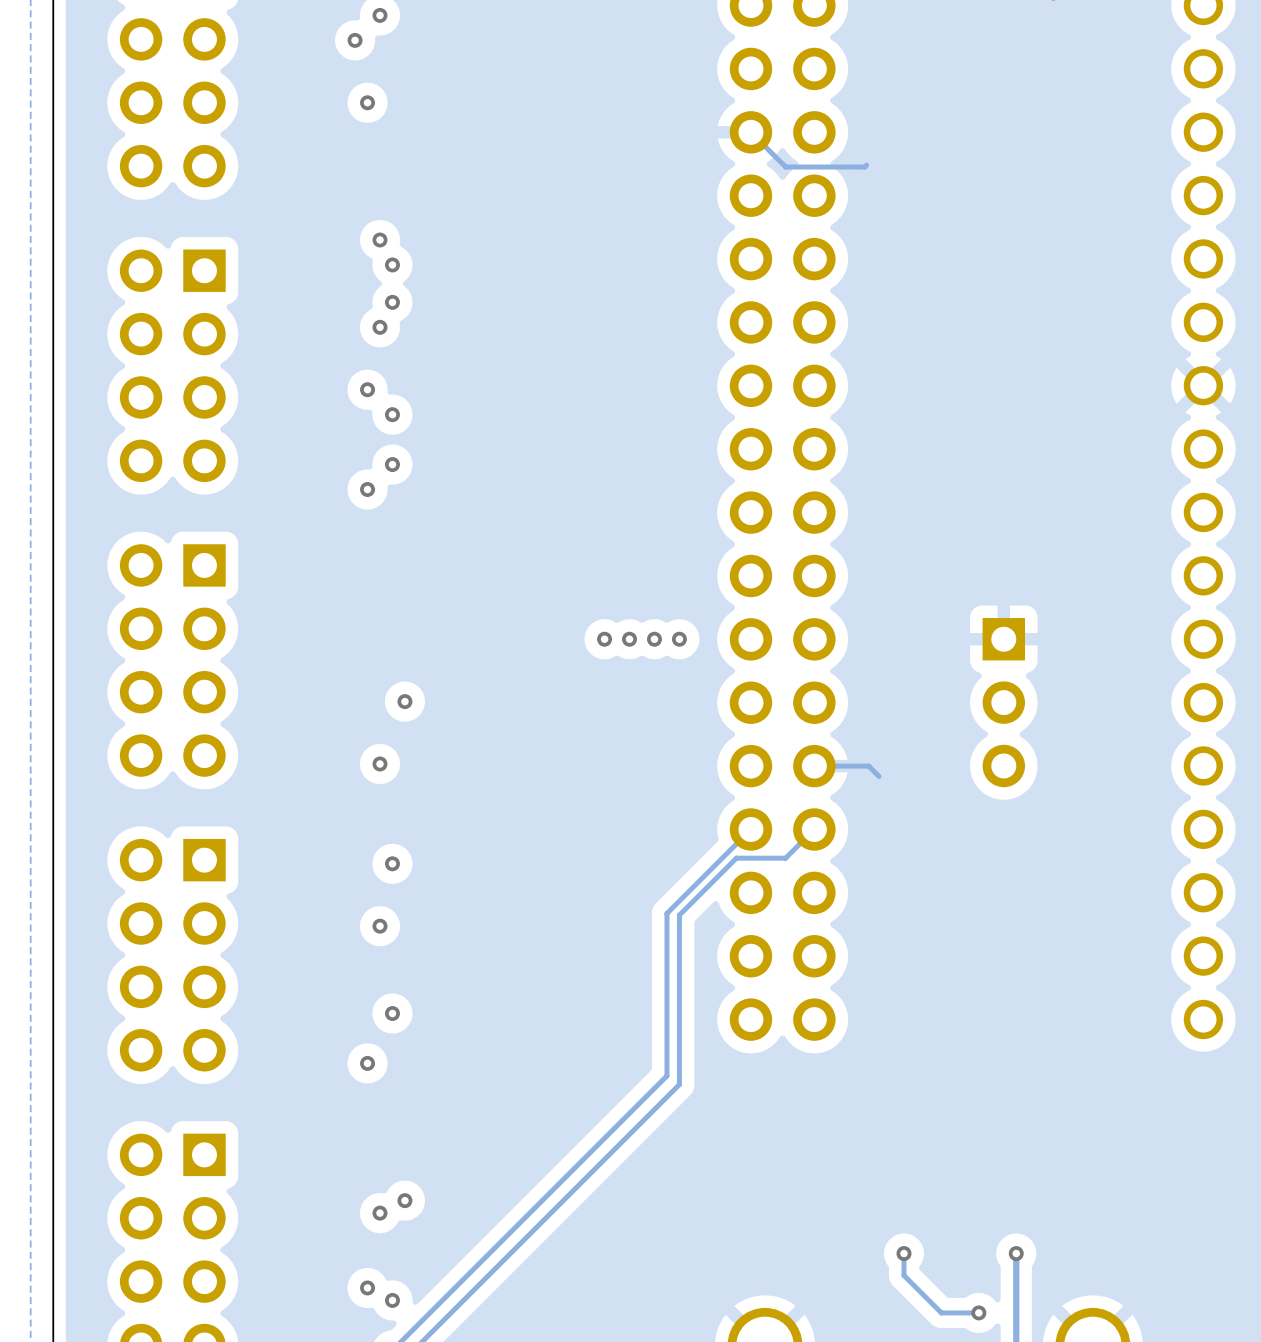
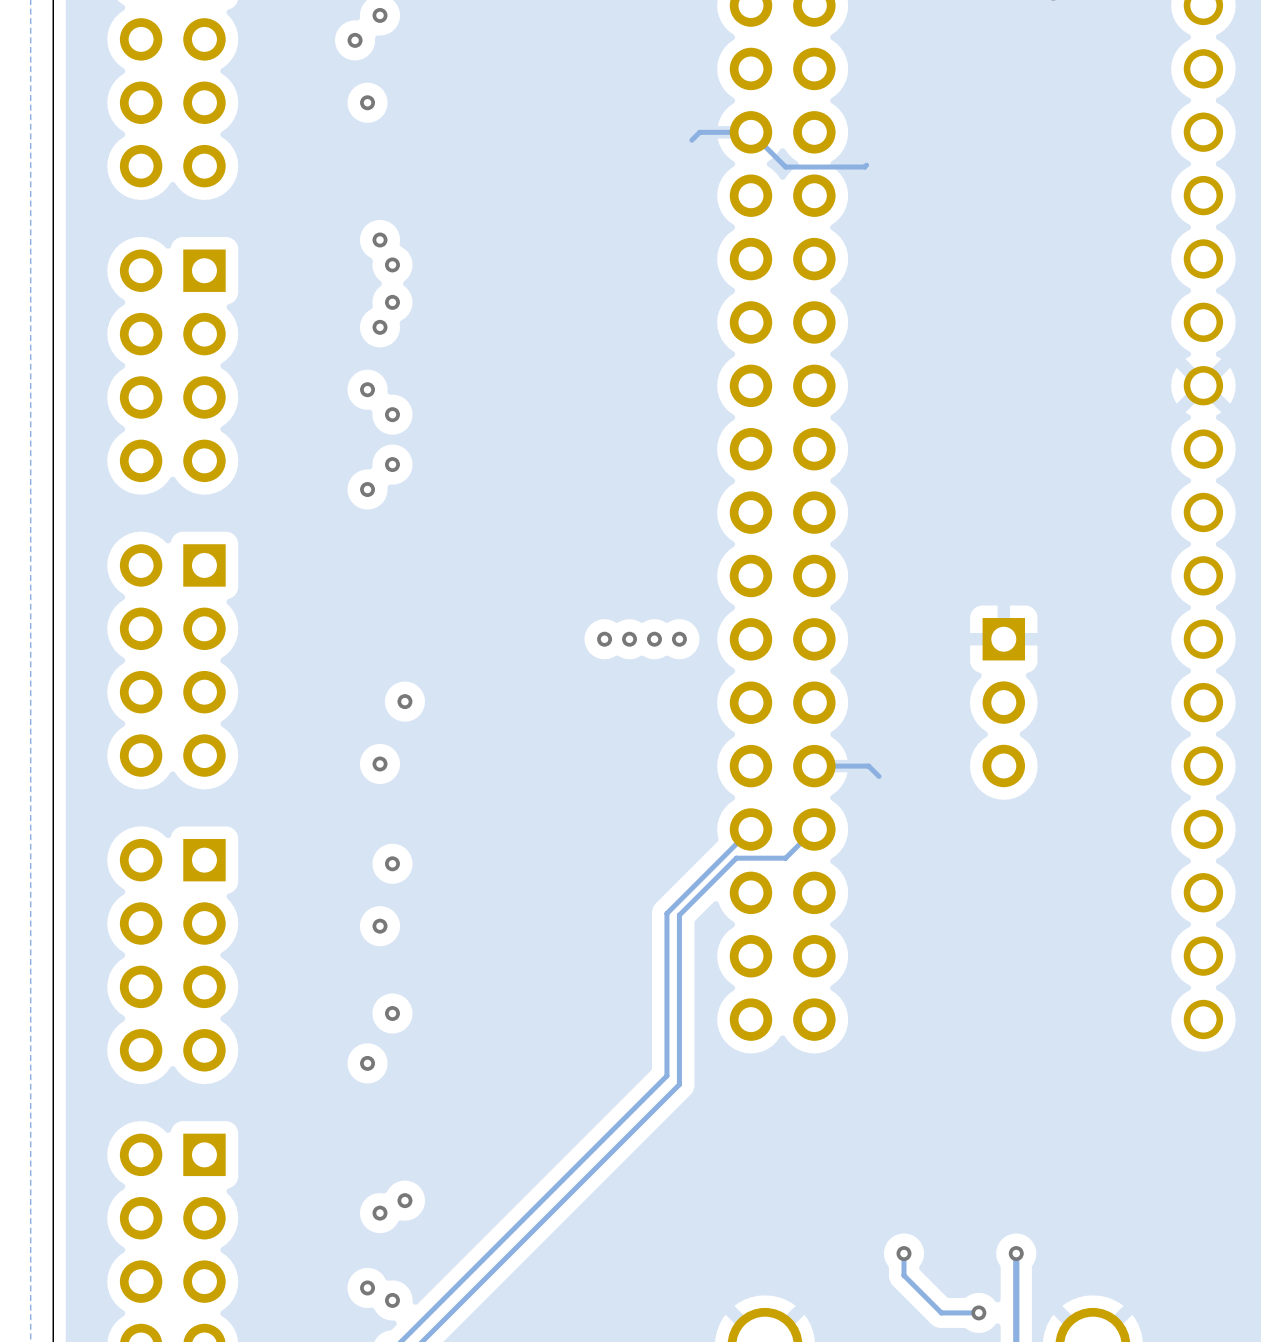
track: none -> (750, 132) (699, 132) (691, 140)

